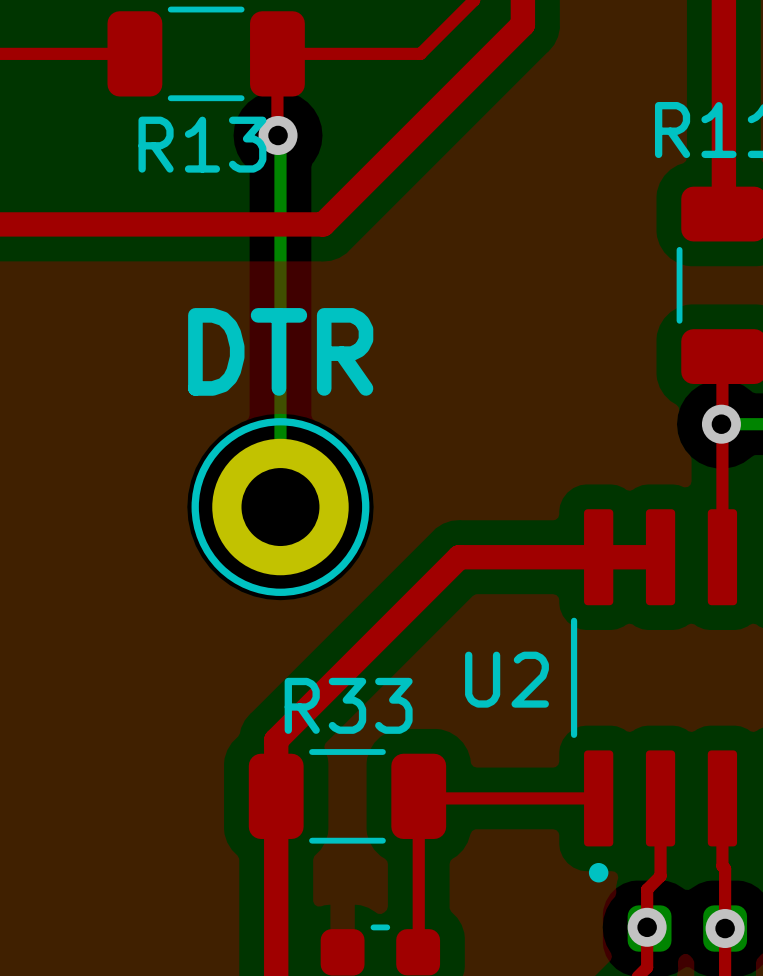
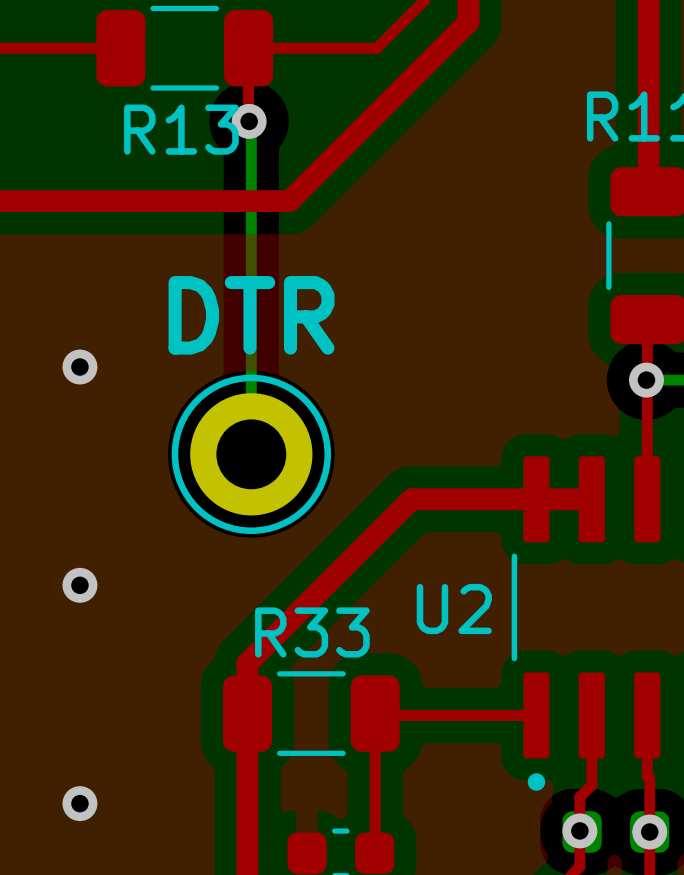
via: none -> (79, 367)
via: none -> (79, 585)
via: none -> (79, 803)

